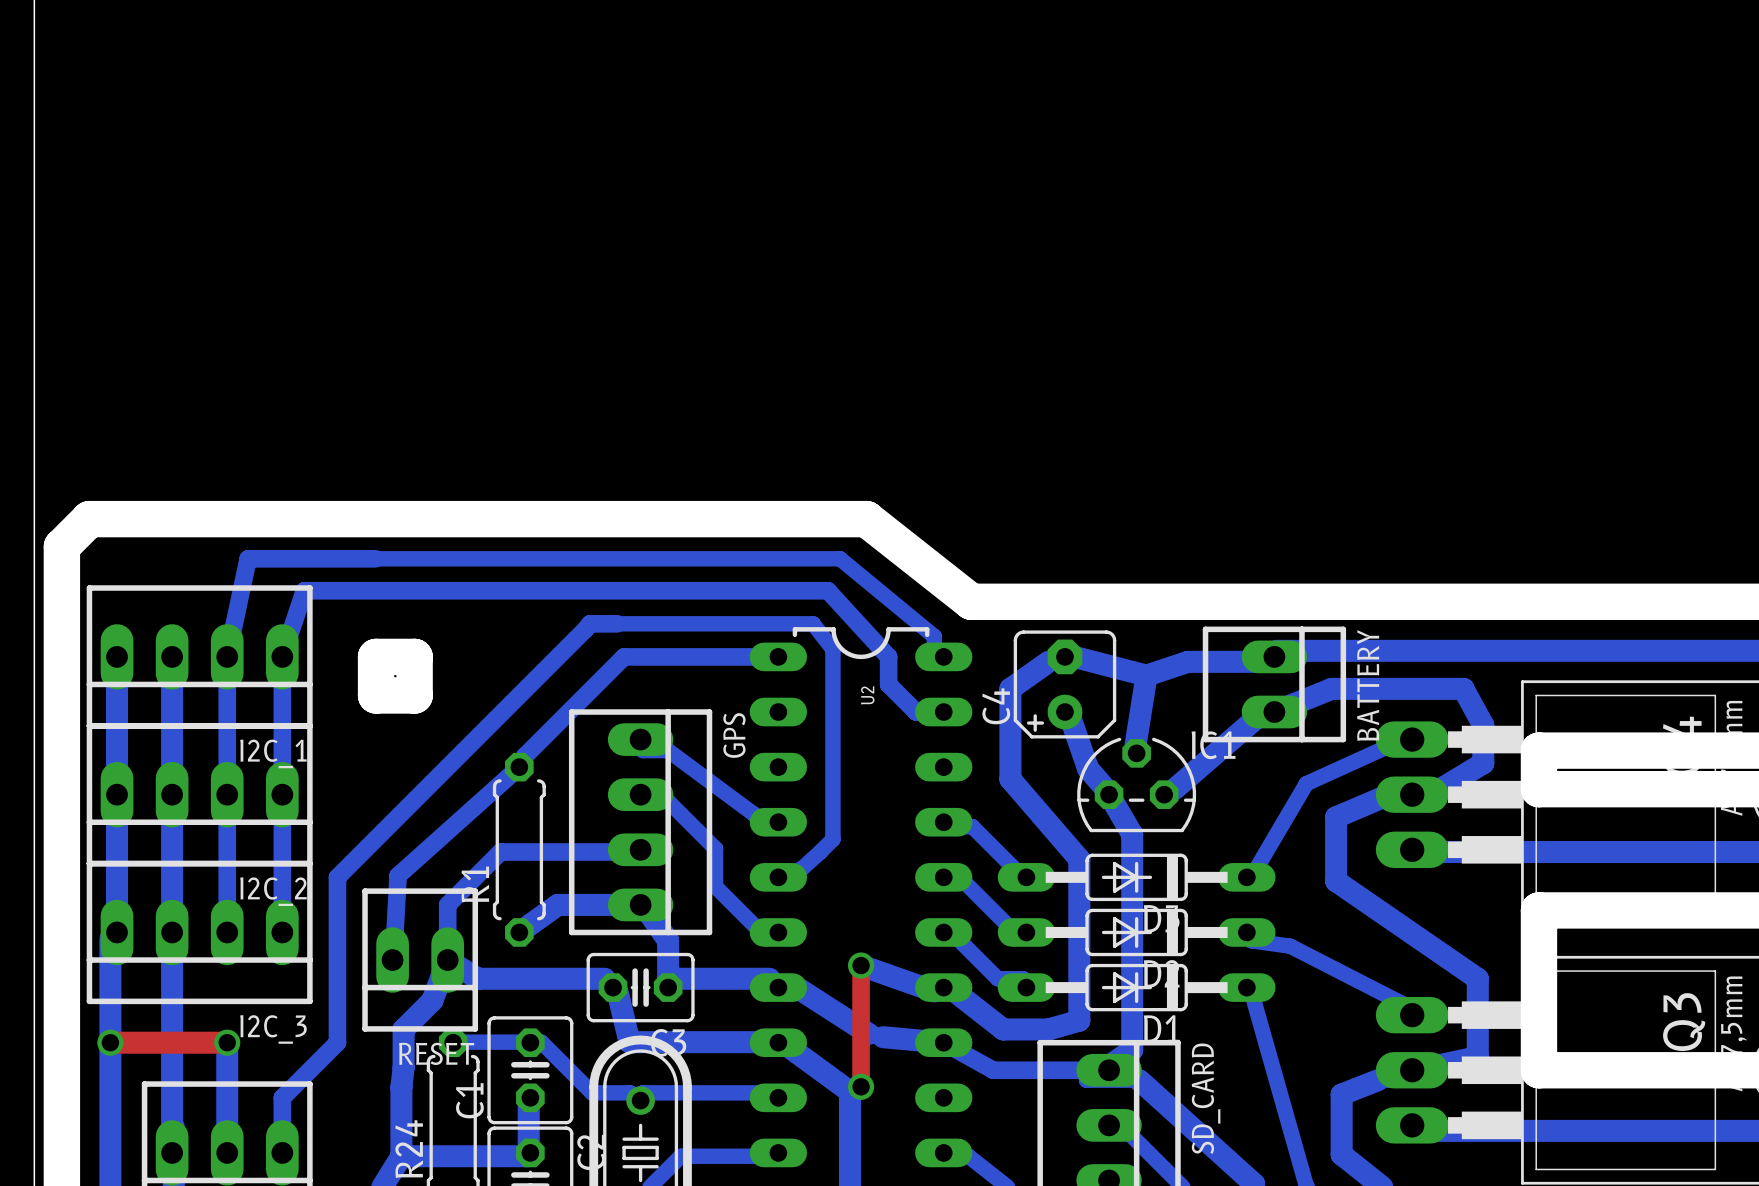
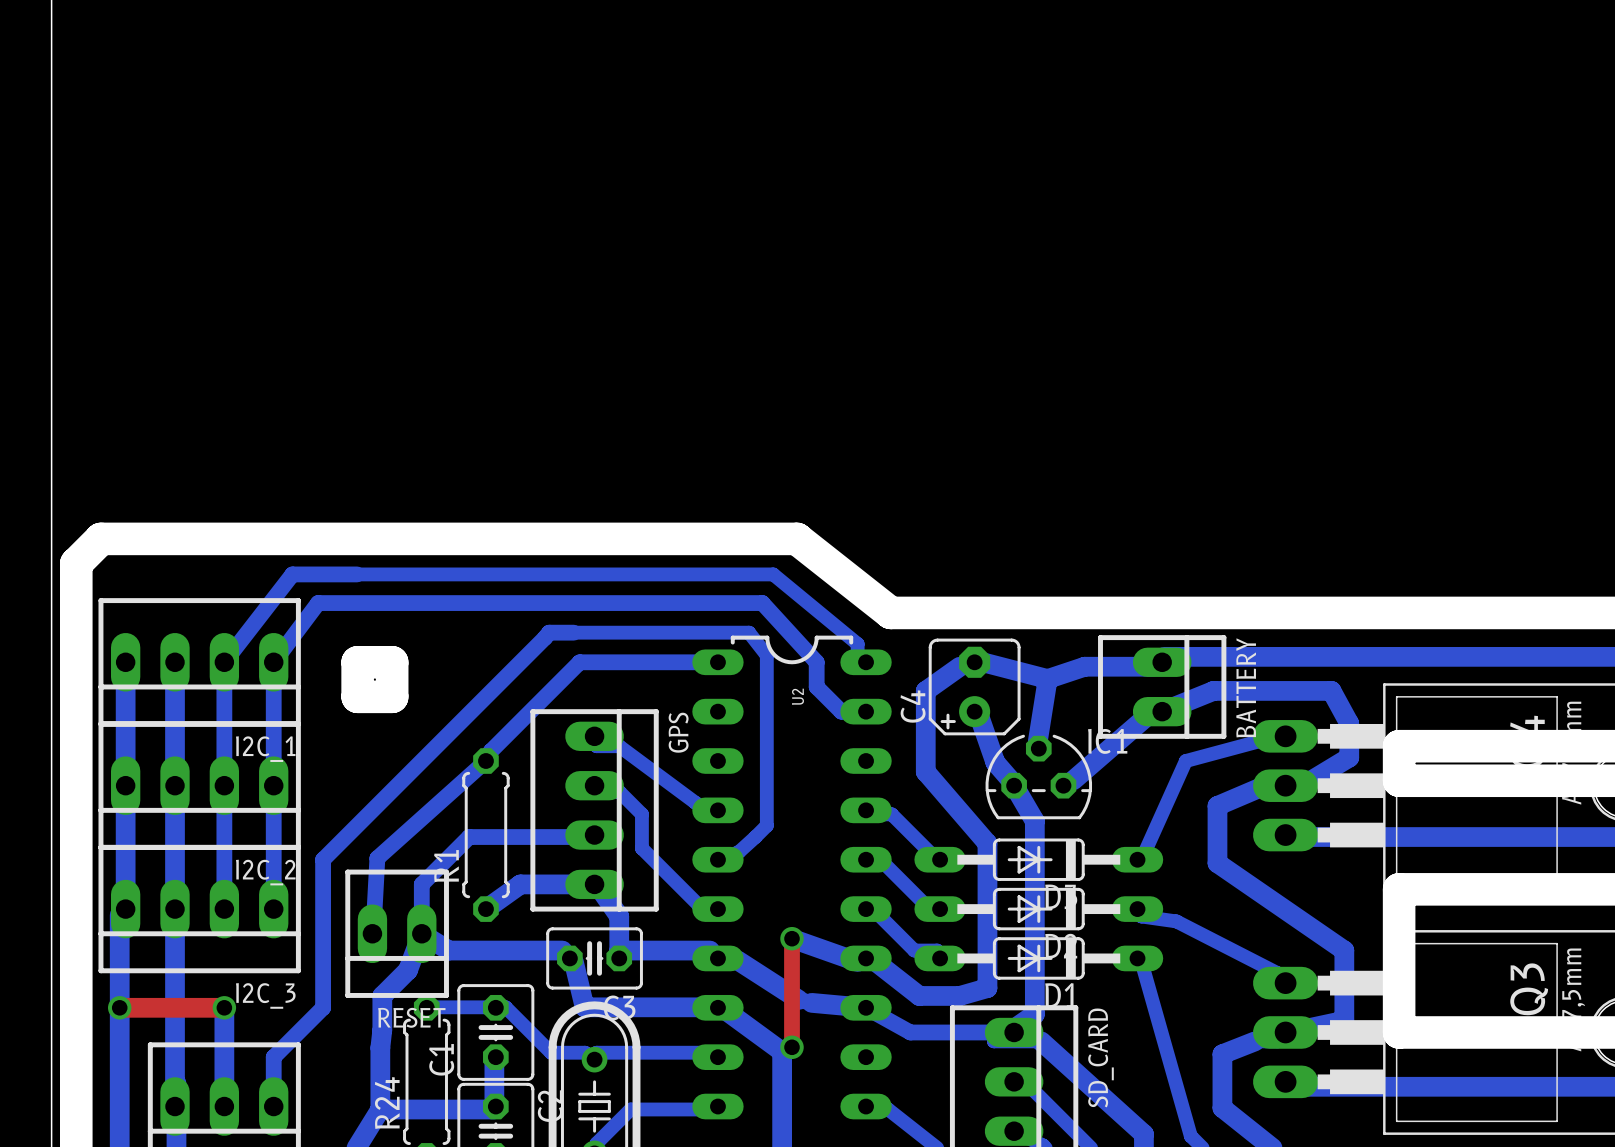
bottom track: (303, 558) (248, 558) (227, 656) -> (292, 574) (224, 662)
bottom track: (331, 590) (304, 590) (282, 656) -> (318, 603) (273, 662)
bottom track: (1403, 739) (1306, 783) (1251, 877) -> (1277, 736) (1185, 761) (1141, 859)
bottom track: (693, 826) (715, 848) (715, 886) -> (641, 814) (641, 848) (661, 868)

